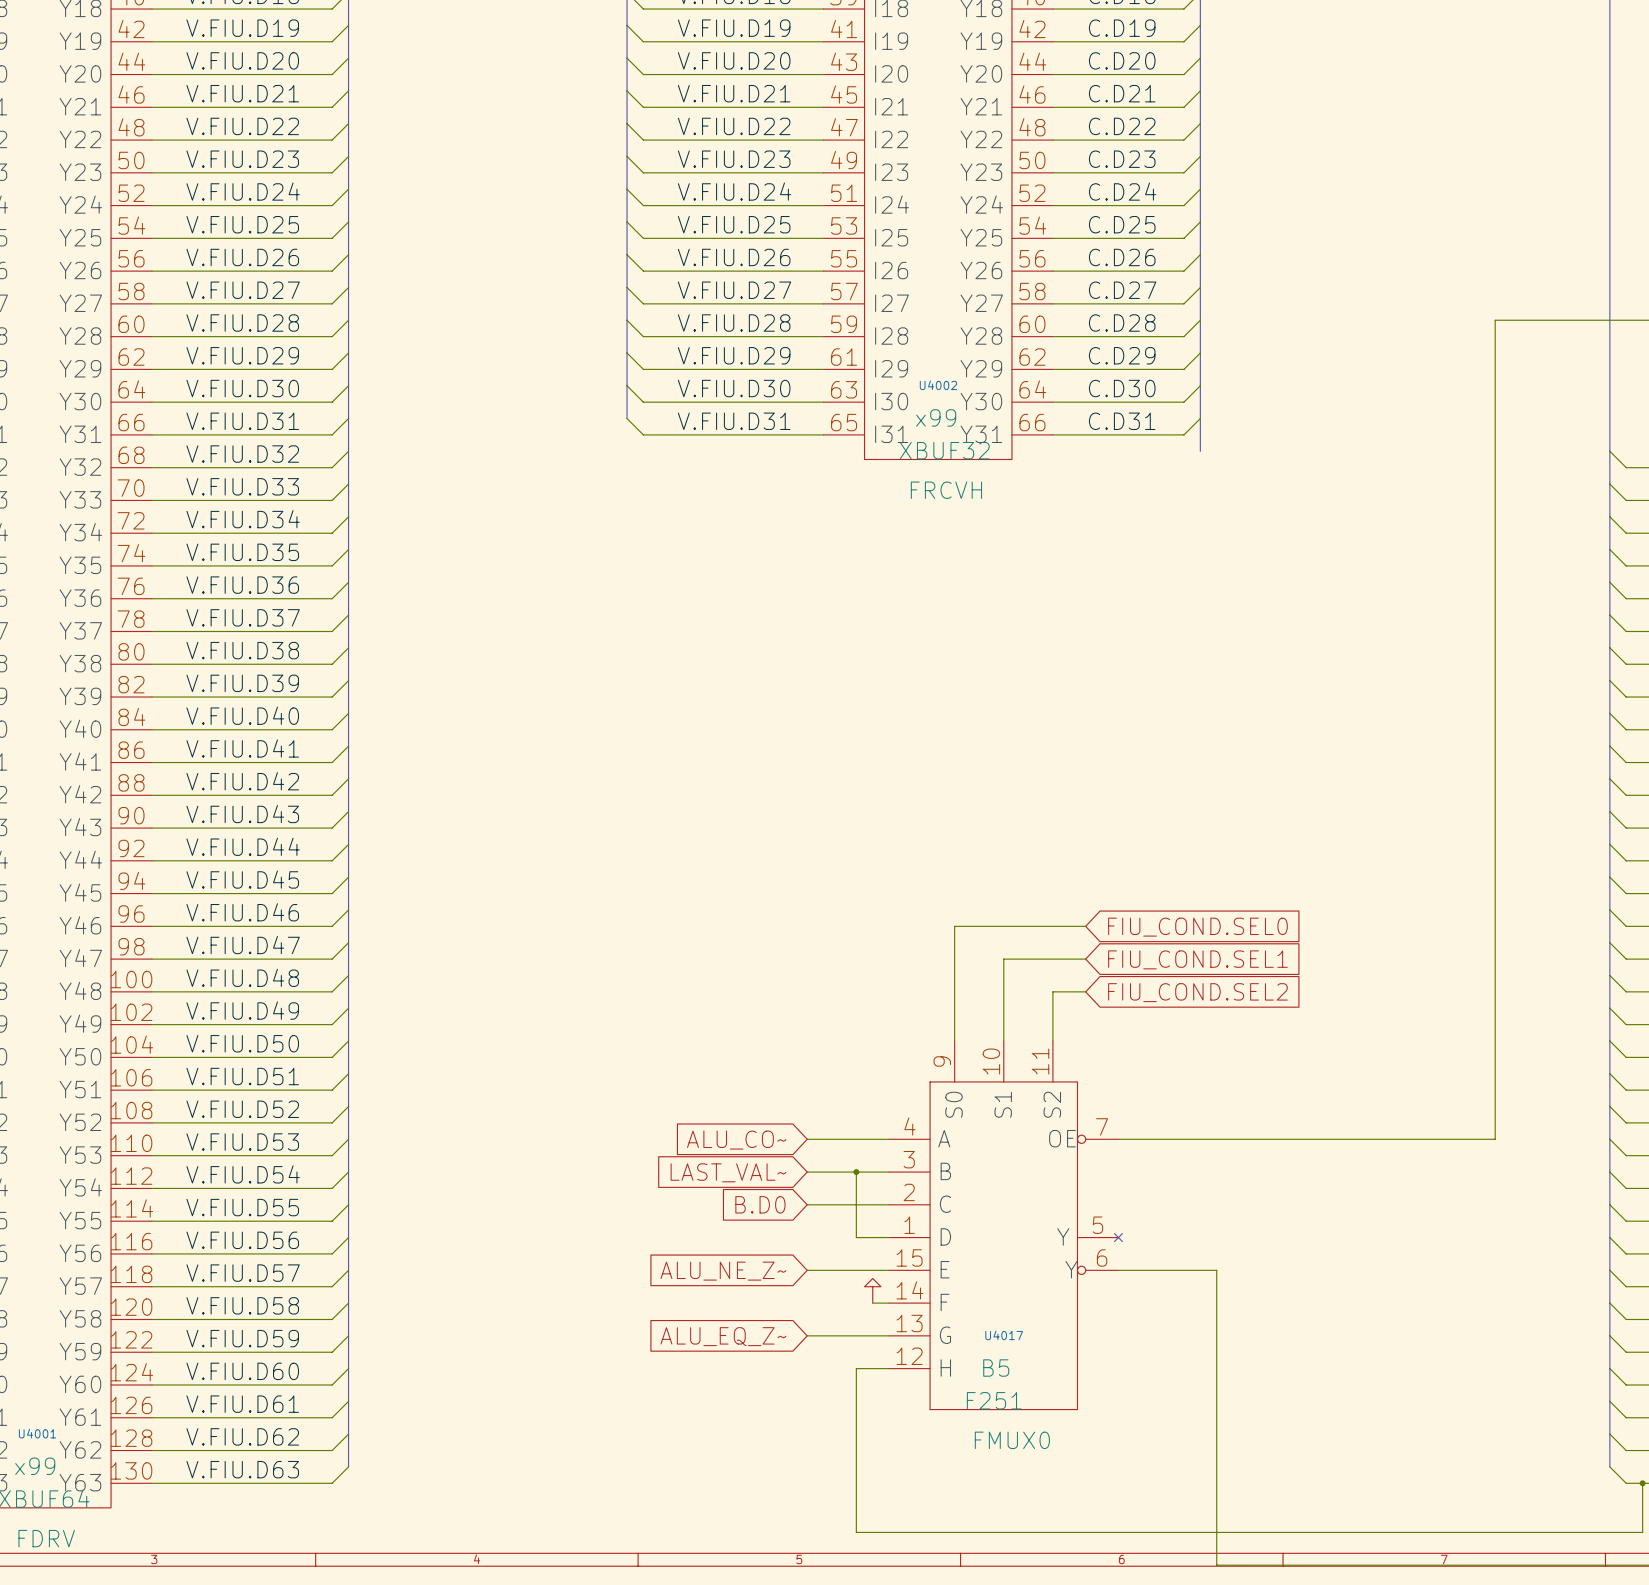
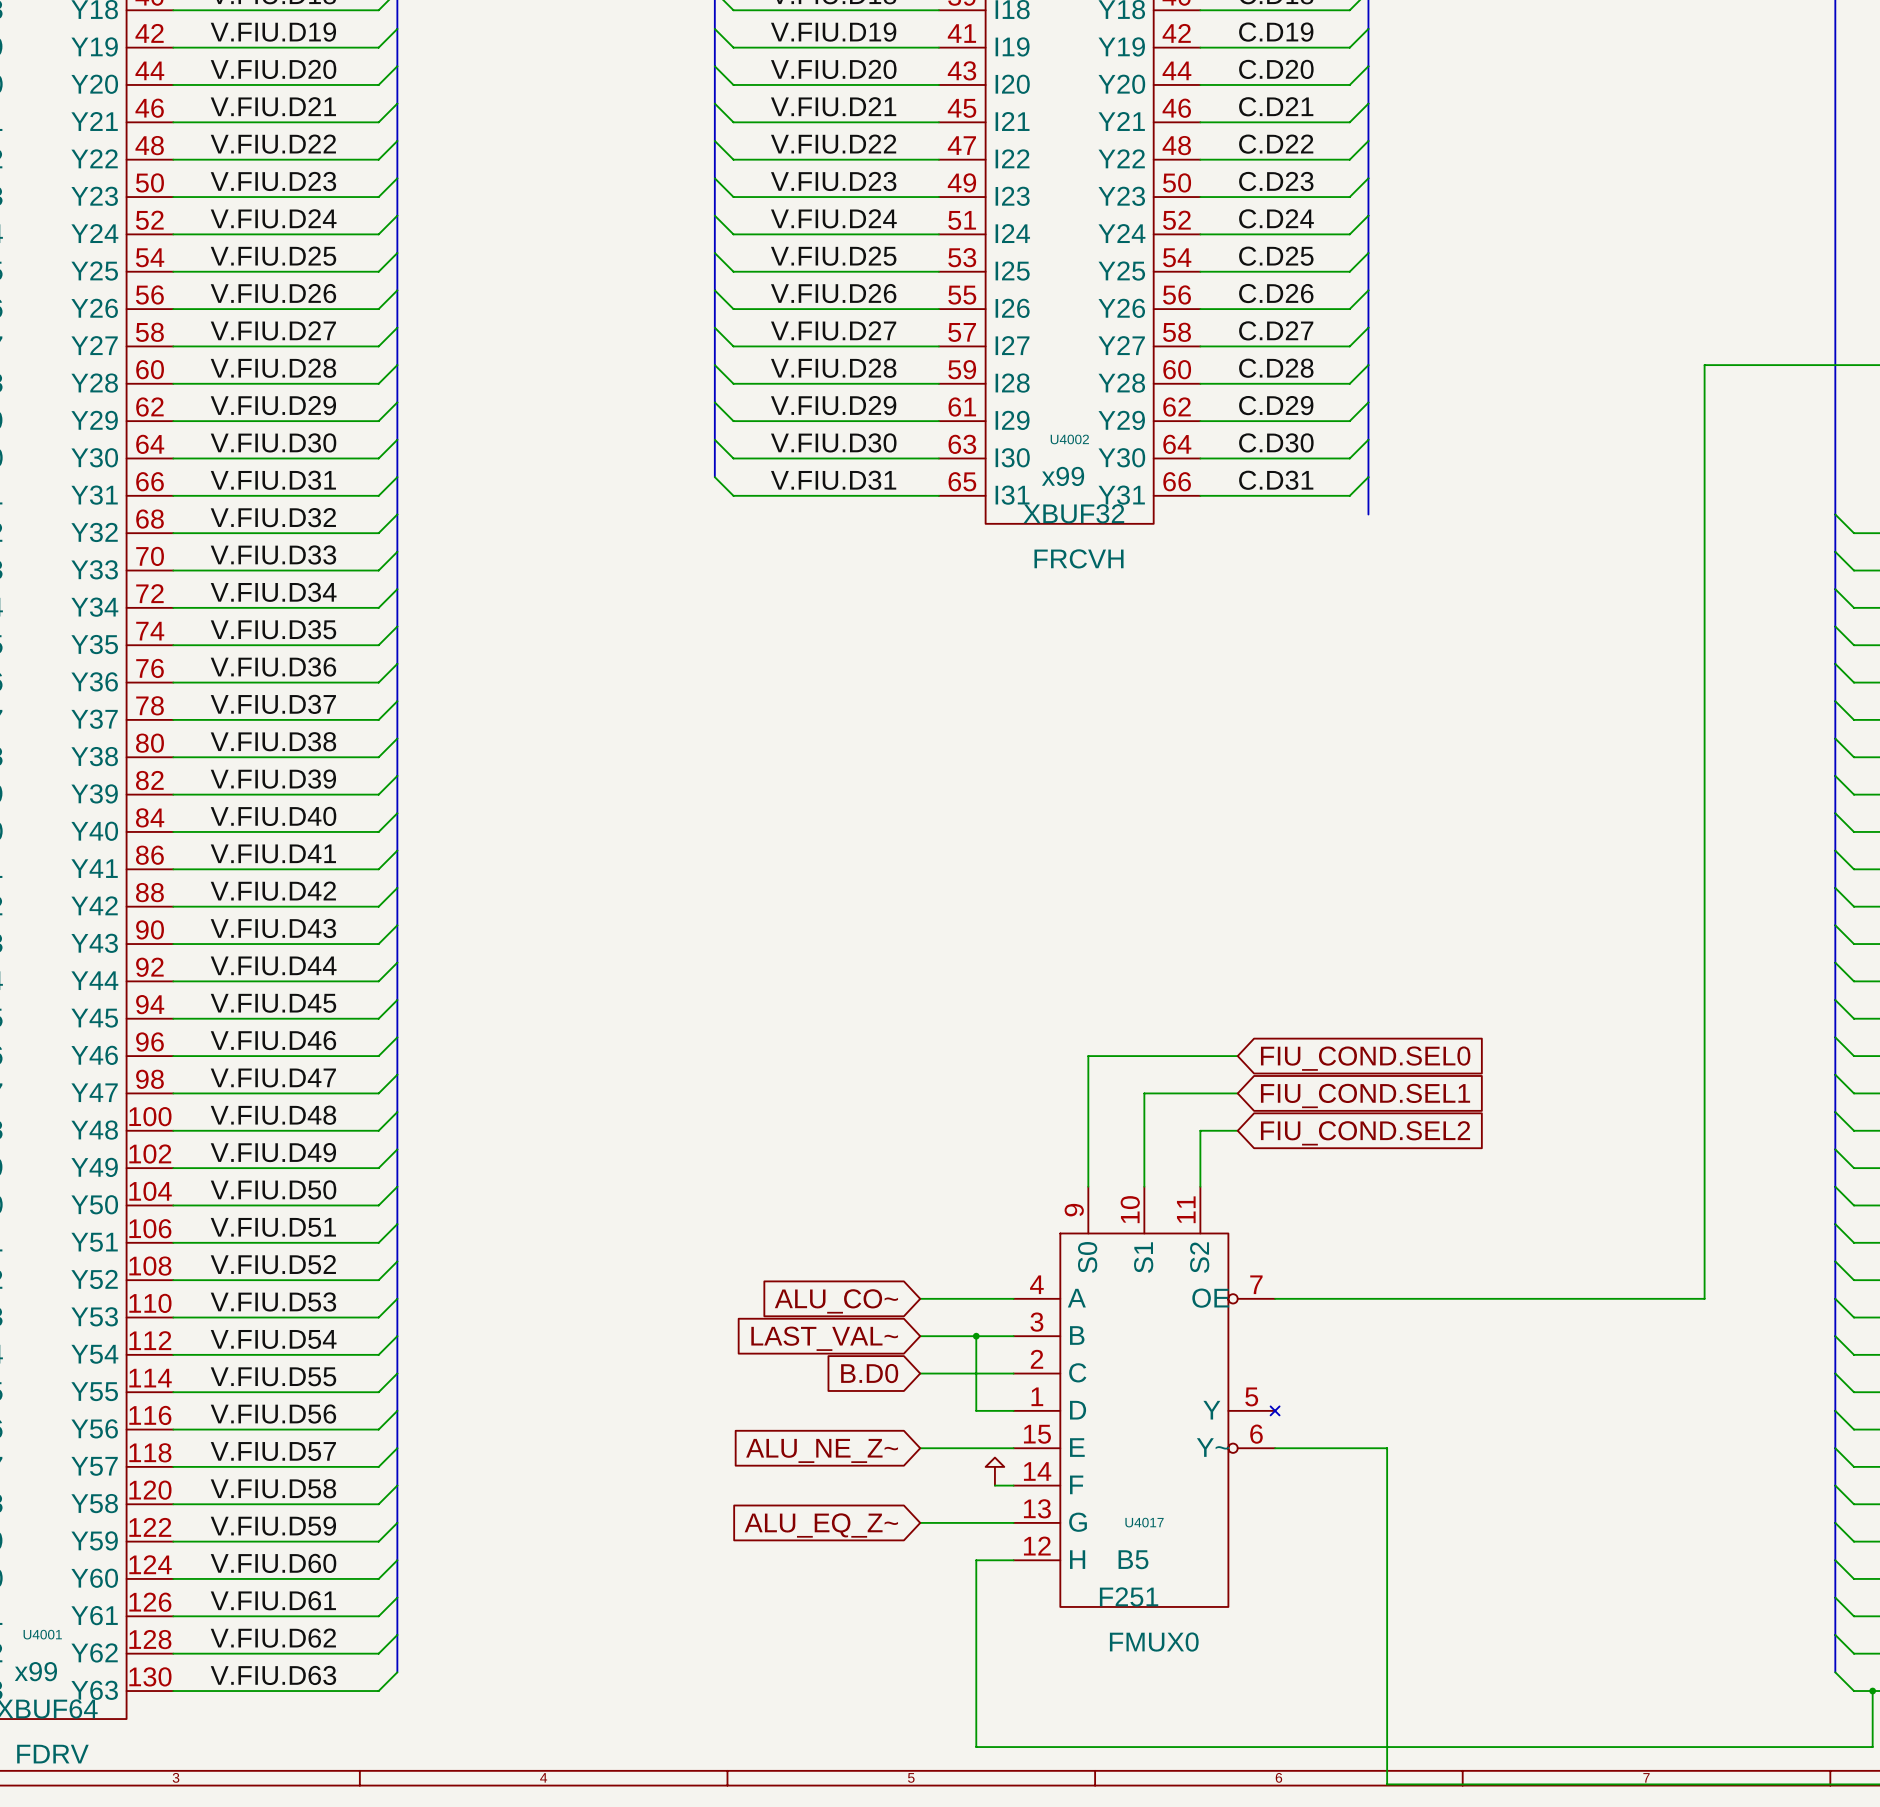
U4017 pin name: Y (1071, 1269) -> Y~ (1212, 1447)

